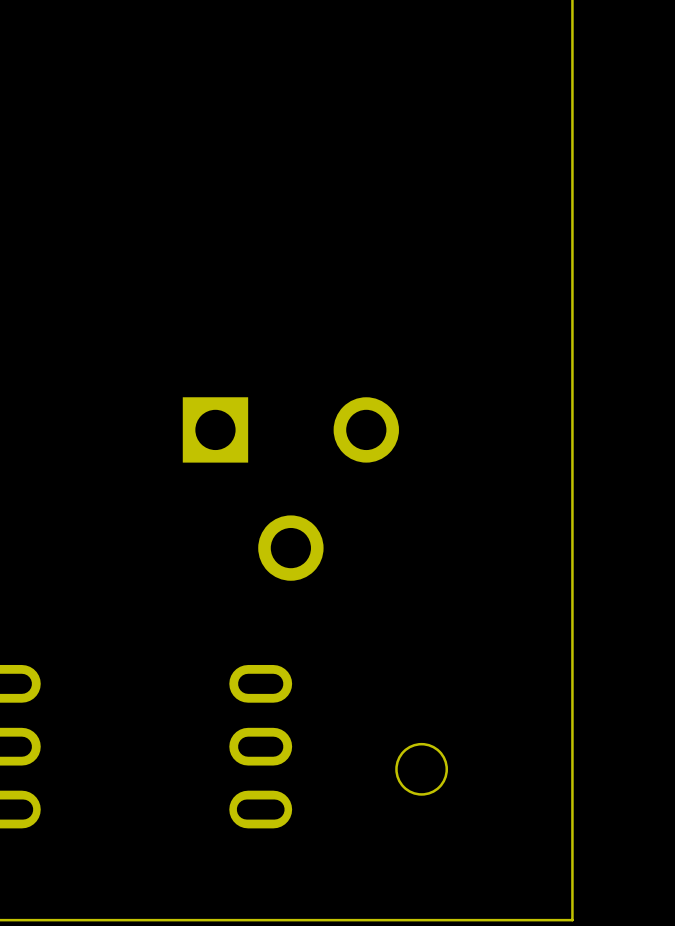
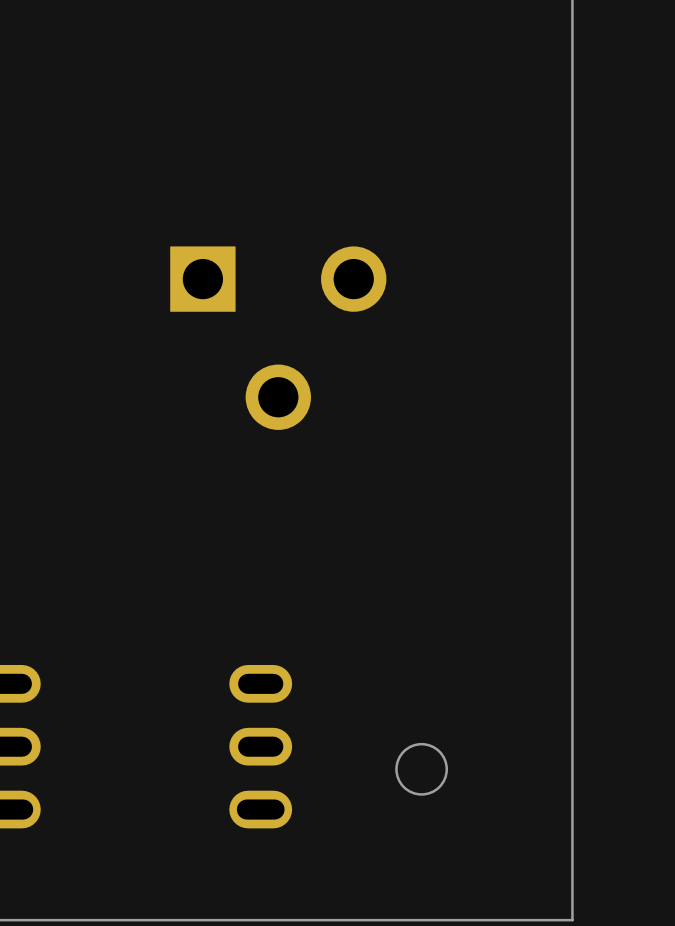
part position: (290, 489) -> (278, 338)

